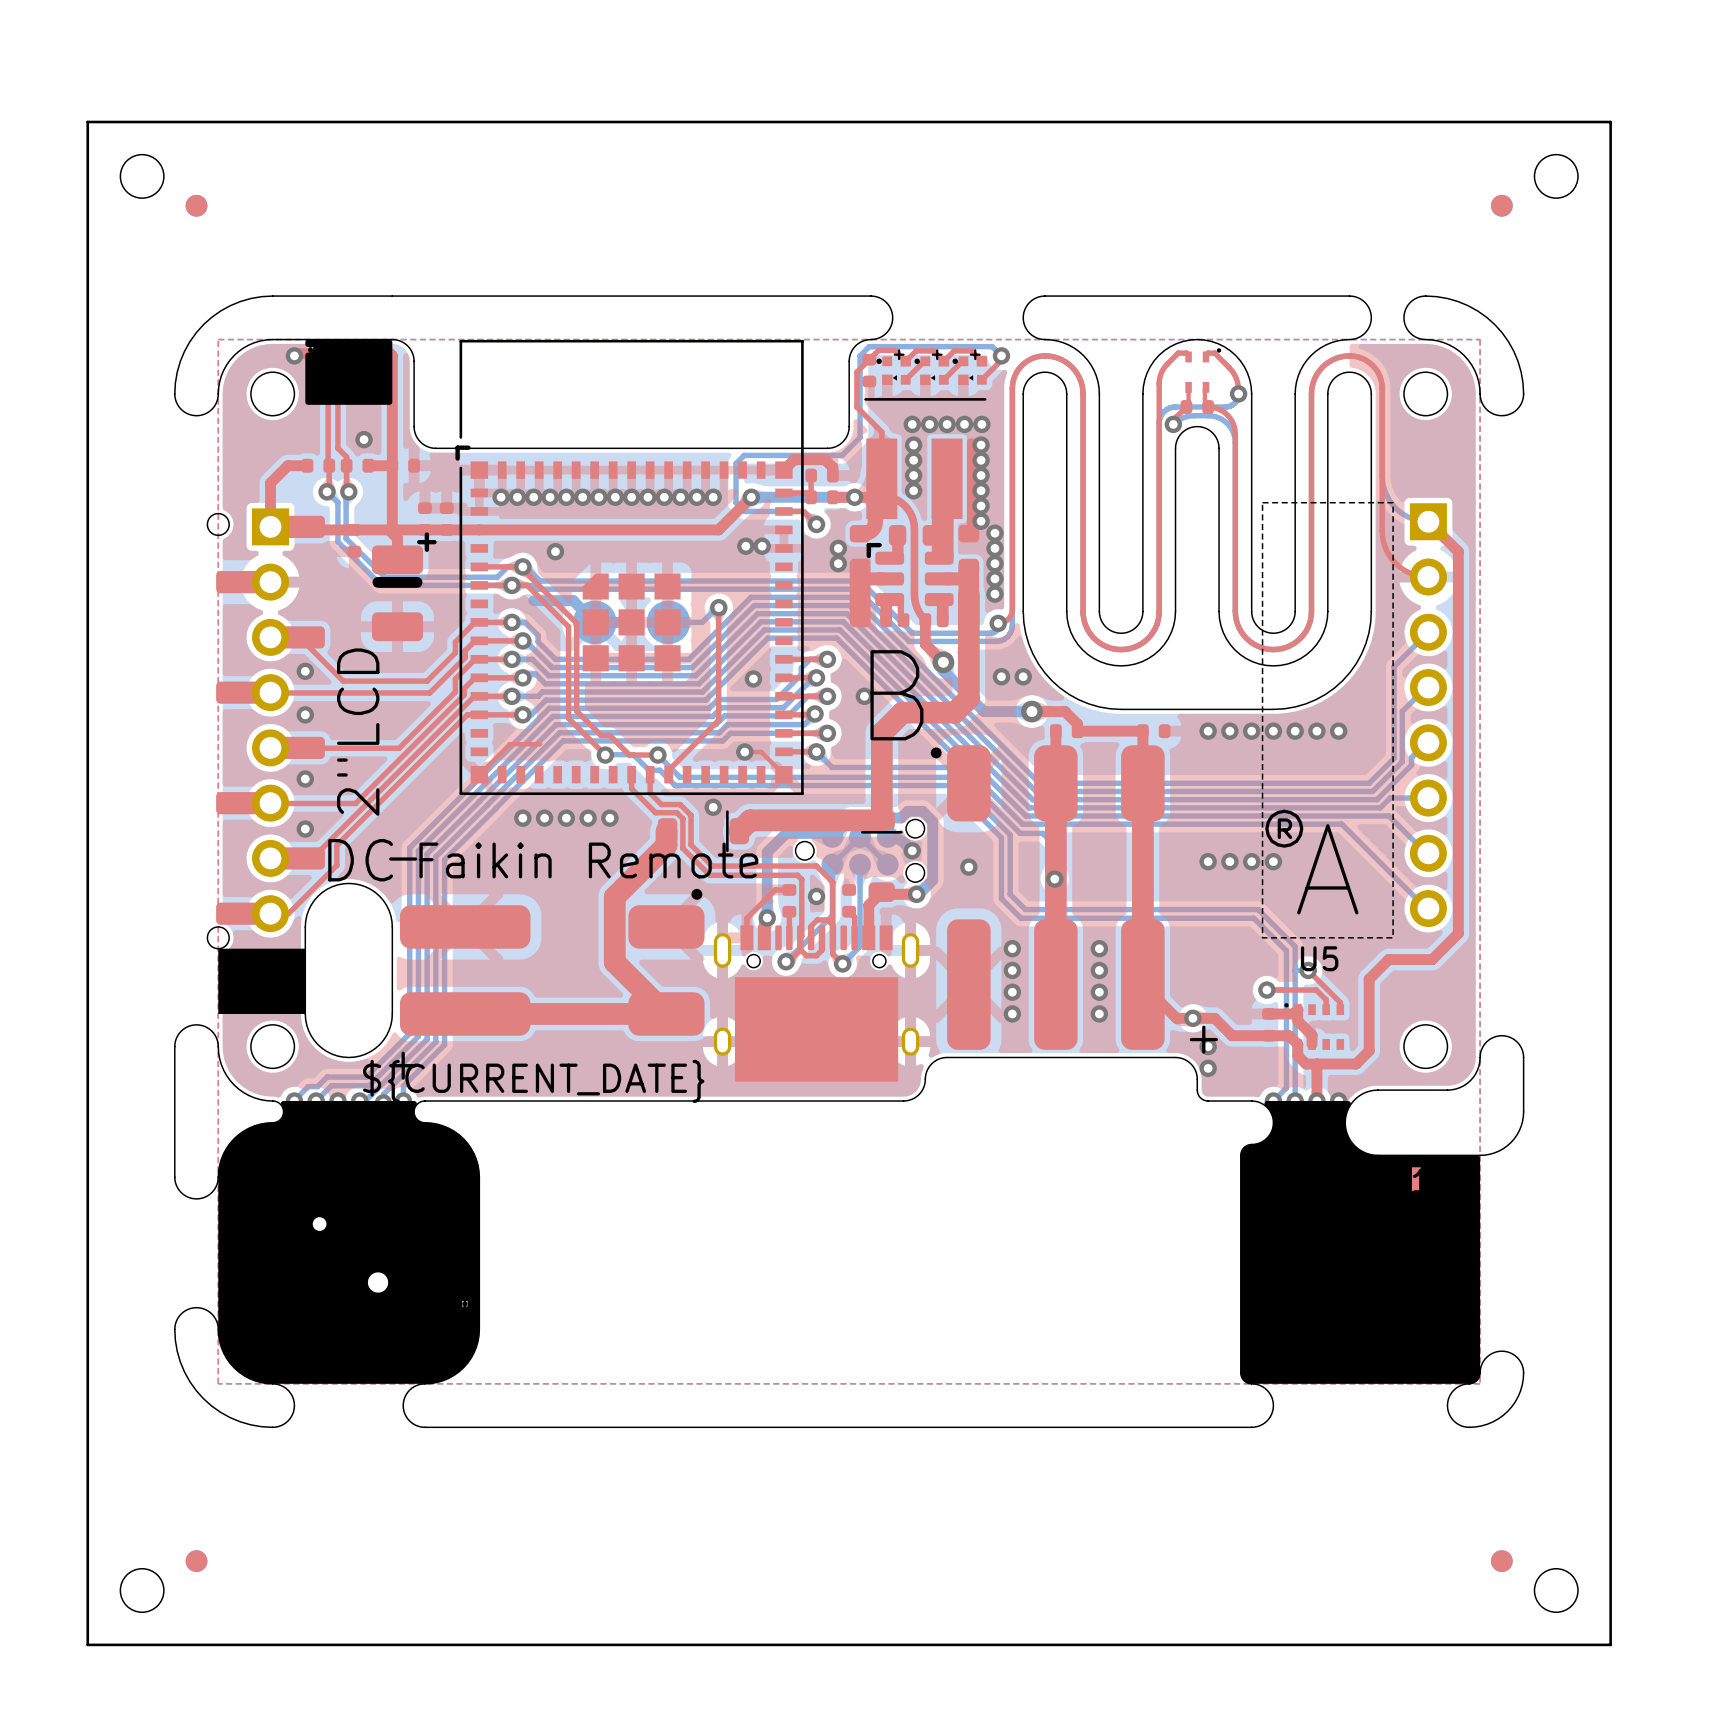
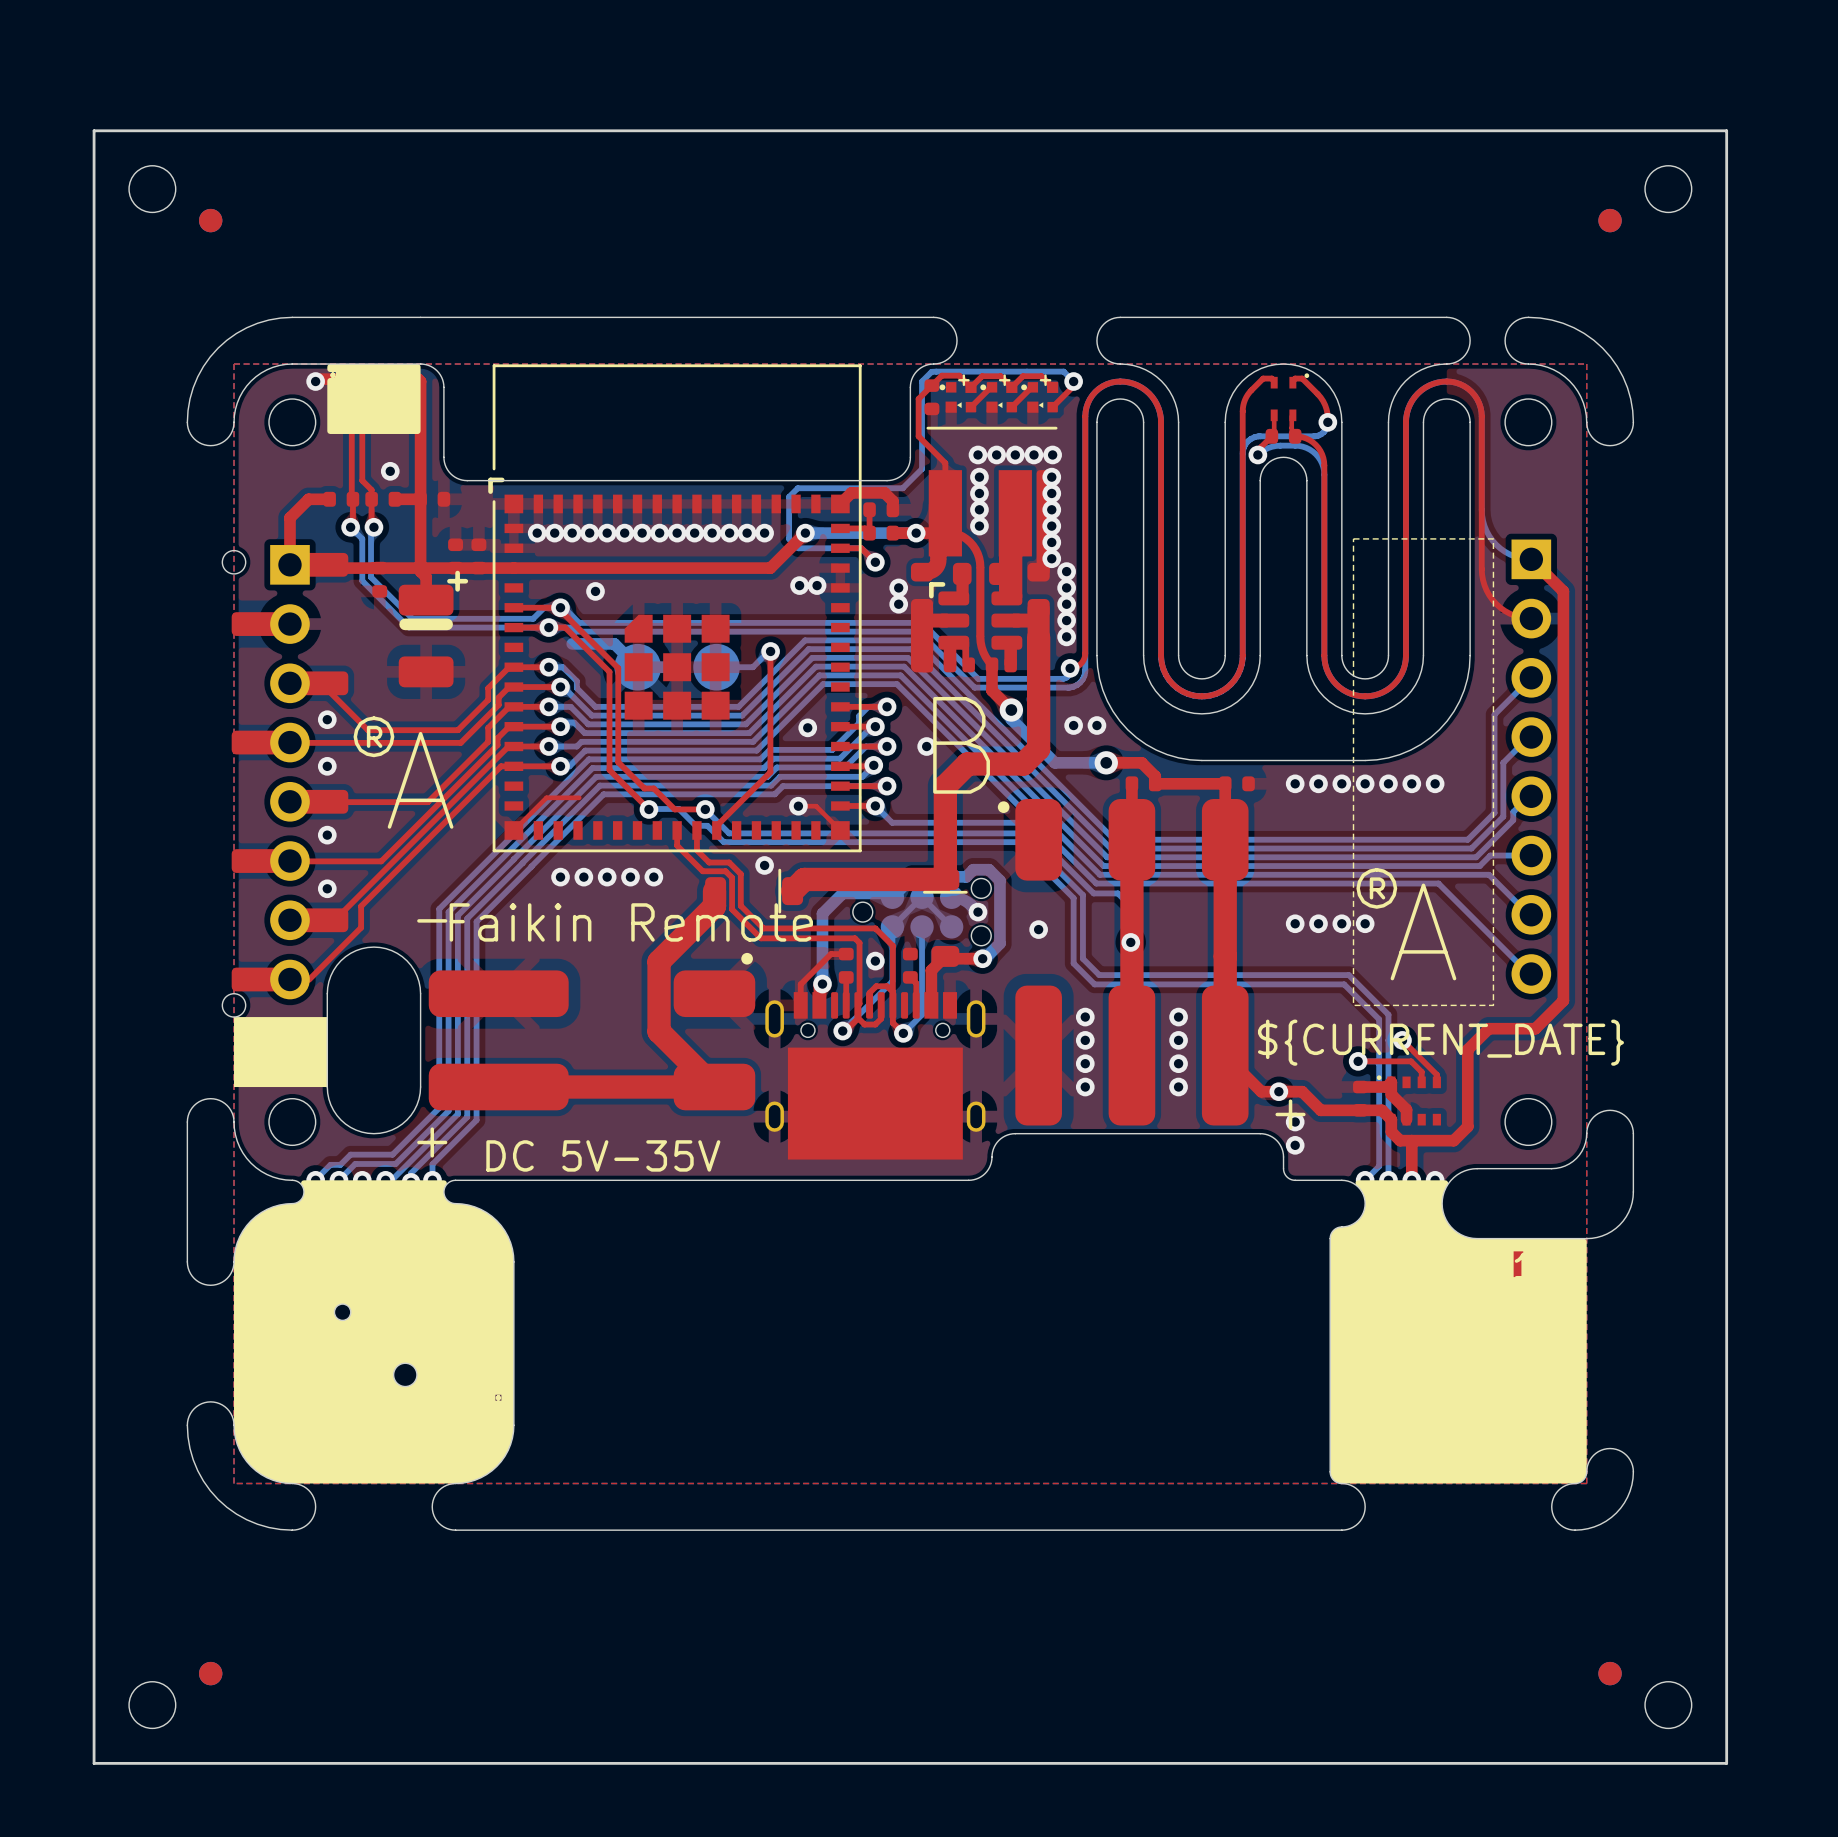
text: none -> ® (373, 736)
text: none -> A (420, 780)
text: 2"LCD (358, 732) -> none
text: DC (360, 860) -> none
U5 name: U5 (1319, 958) -> none
text: none -> ${CURRENT_DATE} (1440, 1042)
text: none -> DC 5V-35V (603, 1155)
text: ${CURRENT_DATE} (533, 1081) -> none

